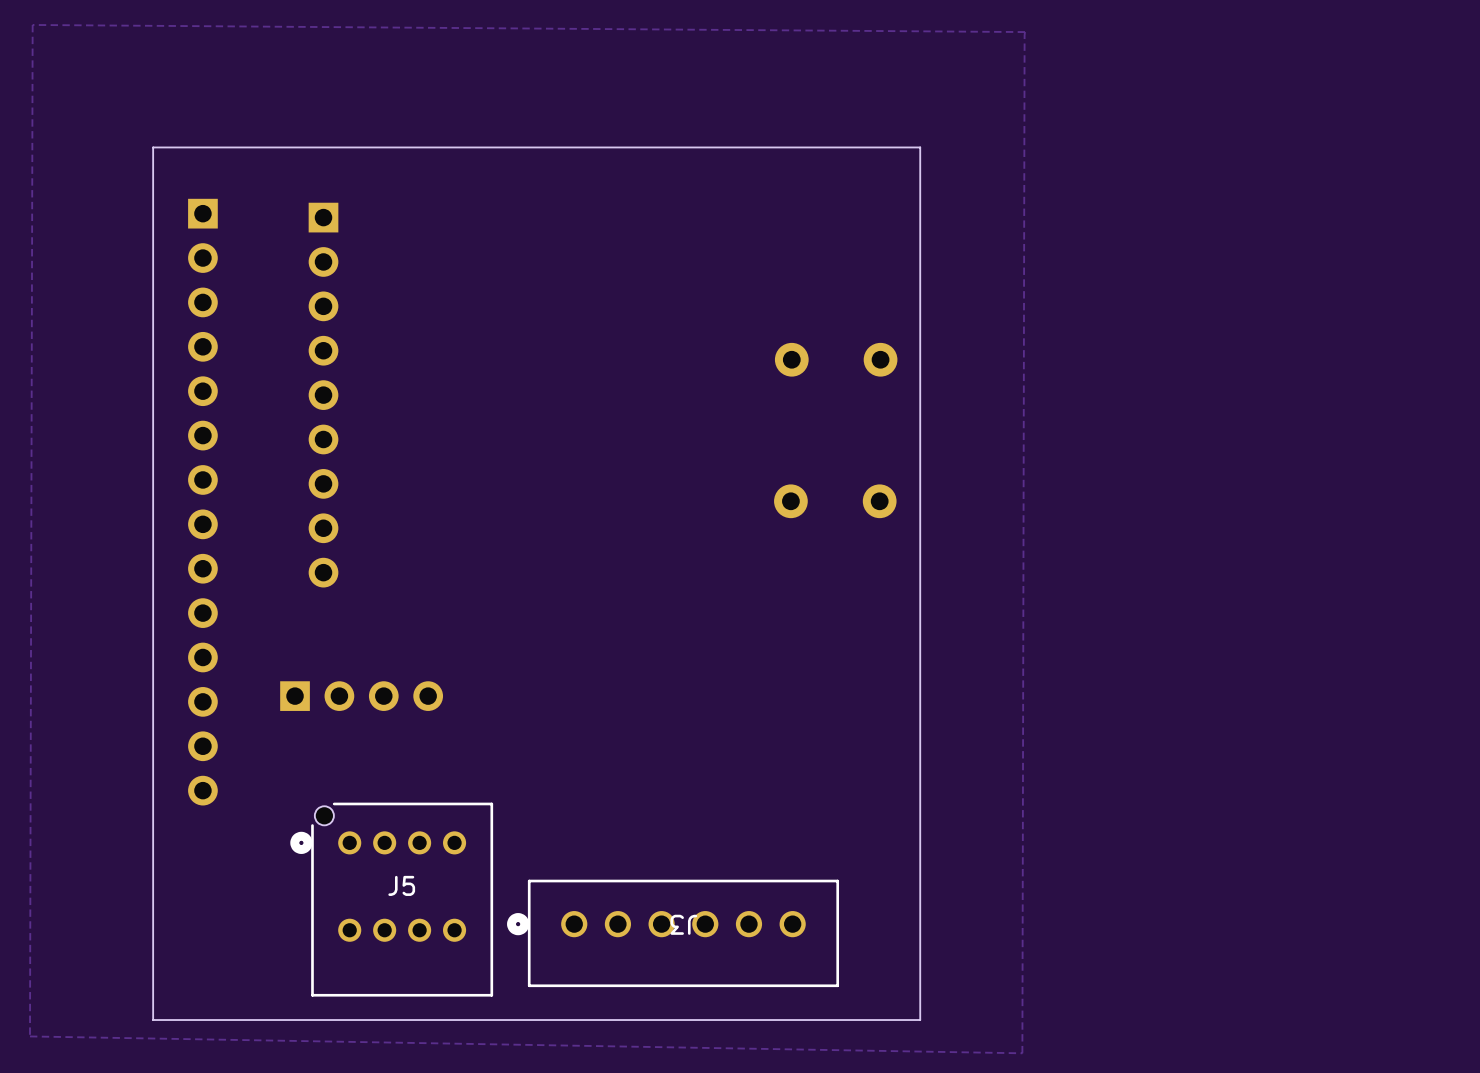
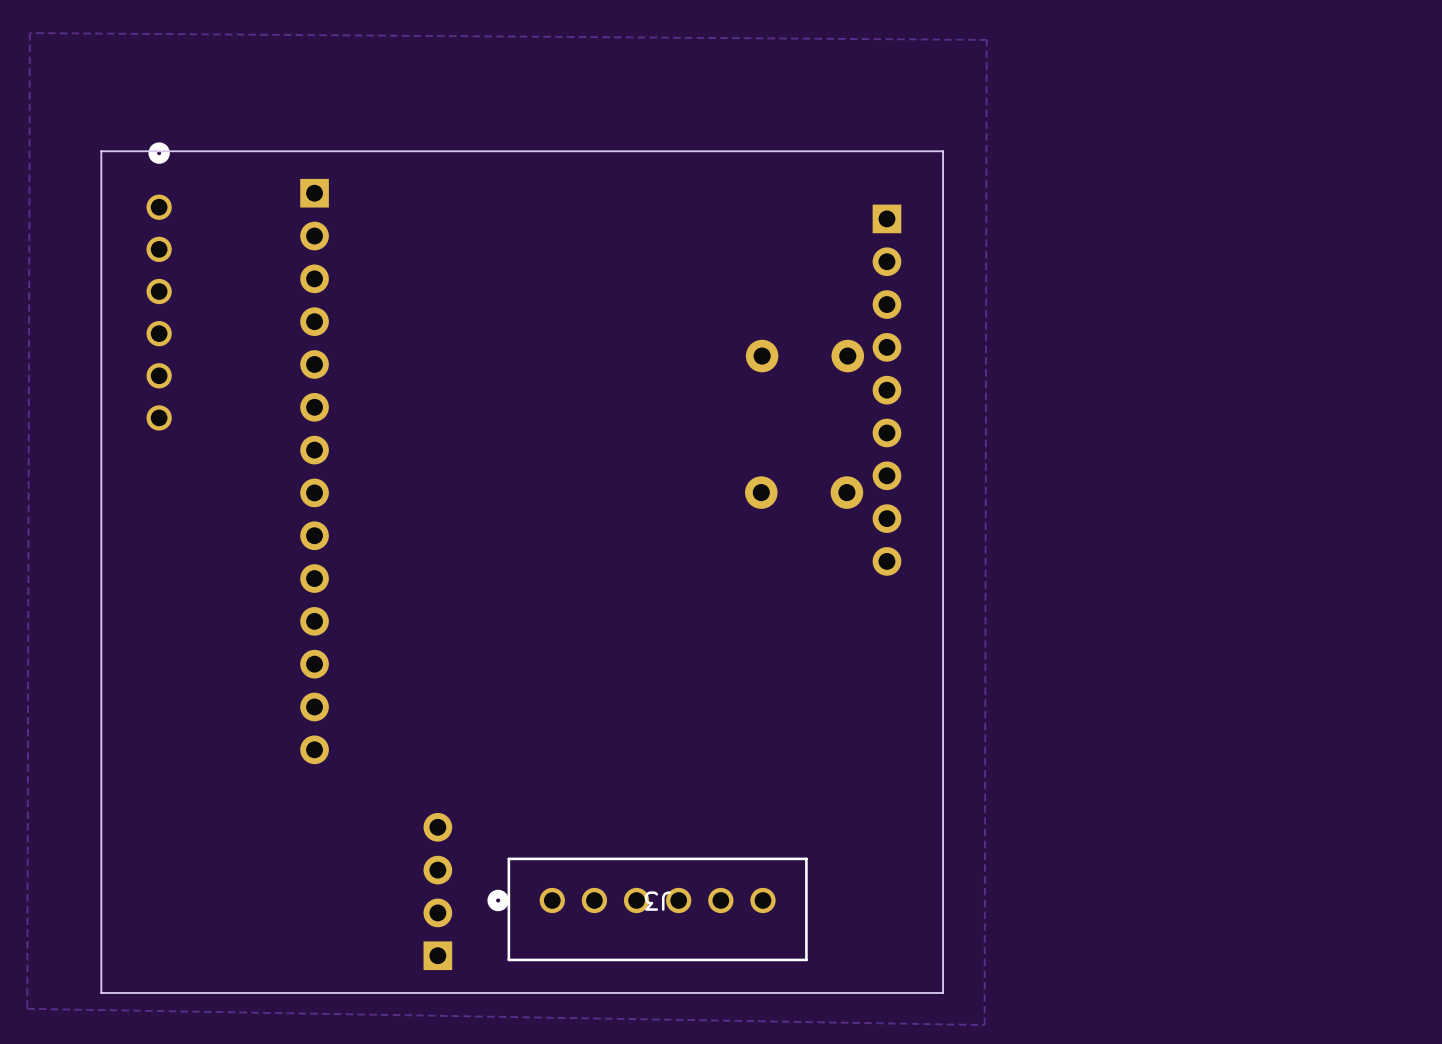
board edge: (153, 147) (153, 1020) -> (146, 151) (101, 151) (101, 992) (146, 992)
board edge: (920, 147) (920, 1020) -> (886, 151) (943, 151) (943, 992) (886, 992)
part: none -> (159, 286)
part: (323, 395) -> none
part: none -> (886, 390)
part position: (202, 502) -> (314, 471)
part rotation: 0° (361, 696) -> 90° counterclockwise (437, 891)
part position: (361, 696) -> (437, 891)
J5: (391, 899) -> none

